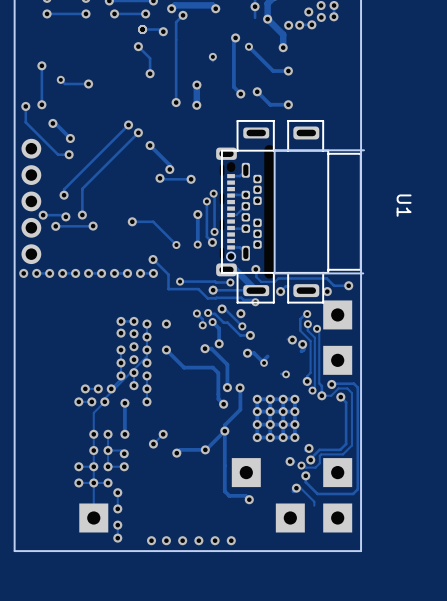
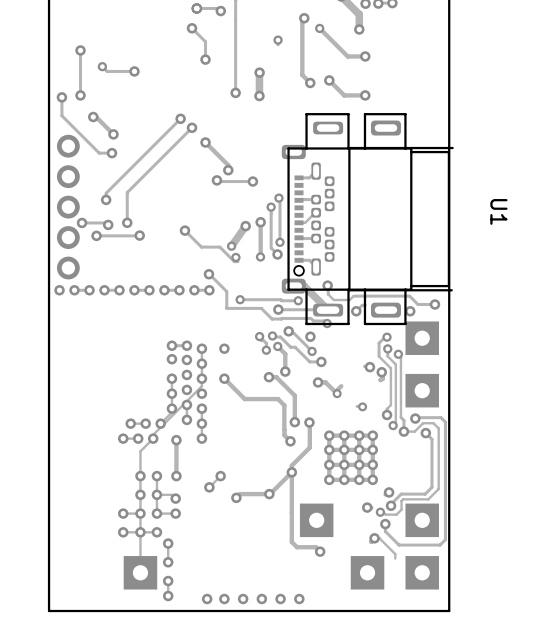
track: none -> (245, 226) (231, 246)
via: none -> (245, 226)
track: none -> (187, 228) (184, 230) (201, 247) (219, 247) (234, 261) (238, 261)
track: (132, 221) (153, 221) (176, 245) -> none
via: none -> (231, 246)

